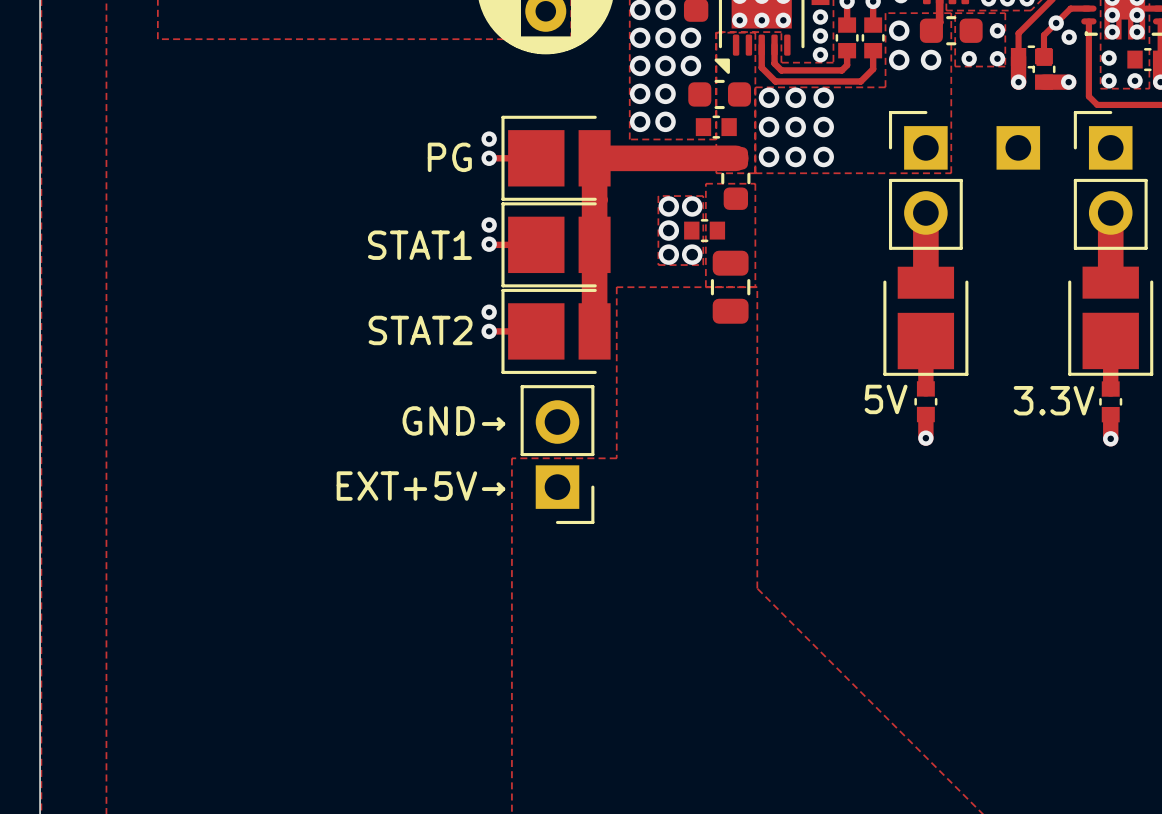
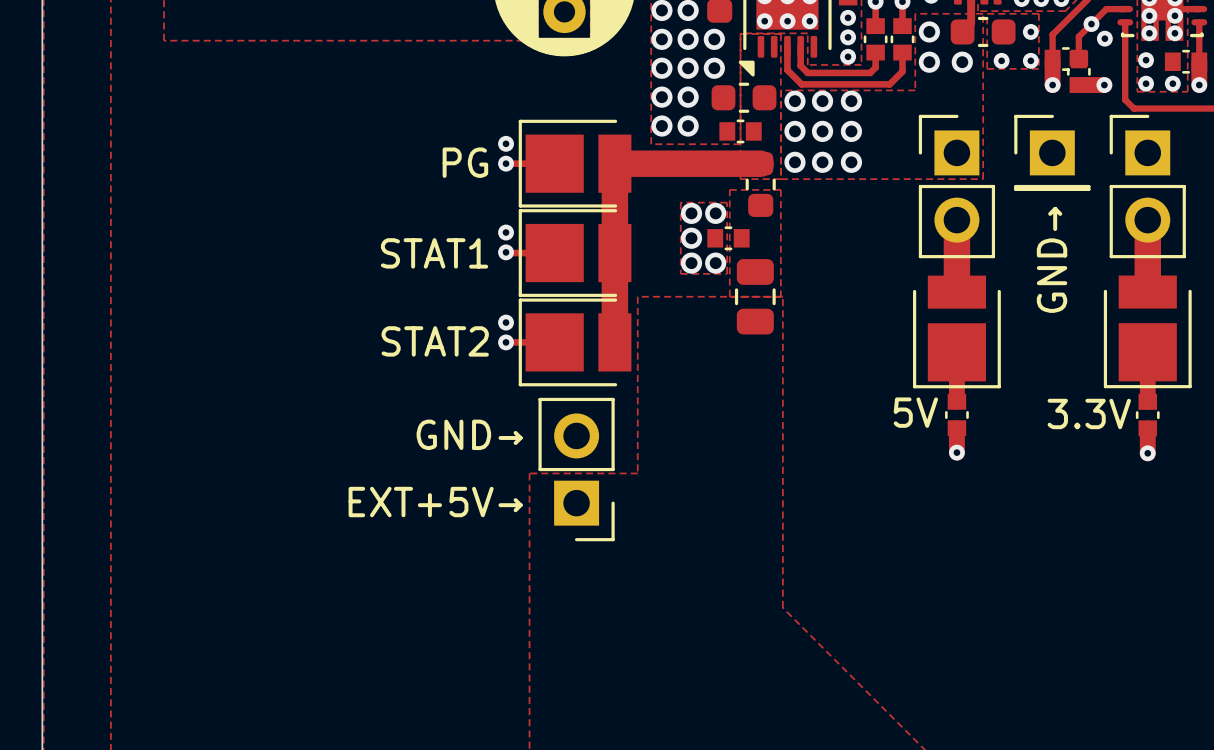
part side: bottom (1018, 147) -> top (1052, 152)
text: none -> GND→ (1052, 259)

